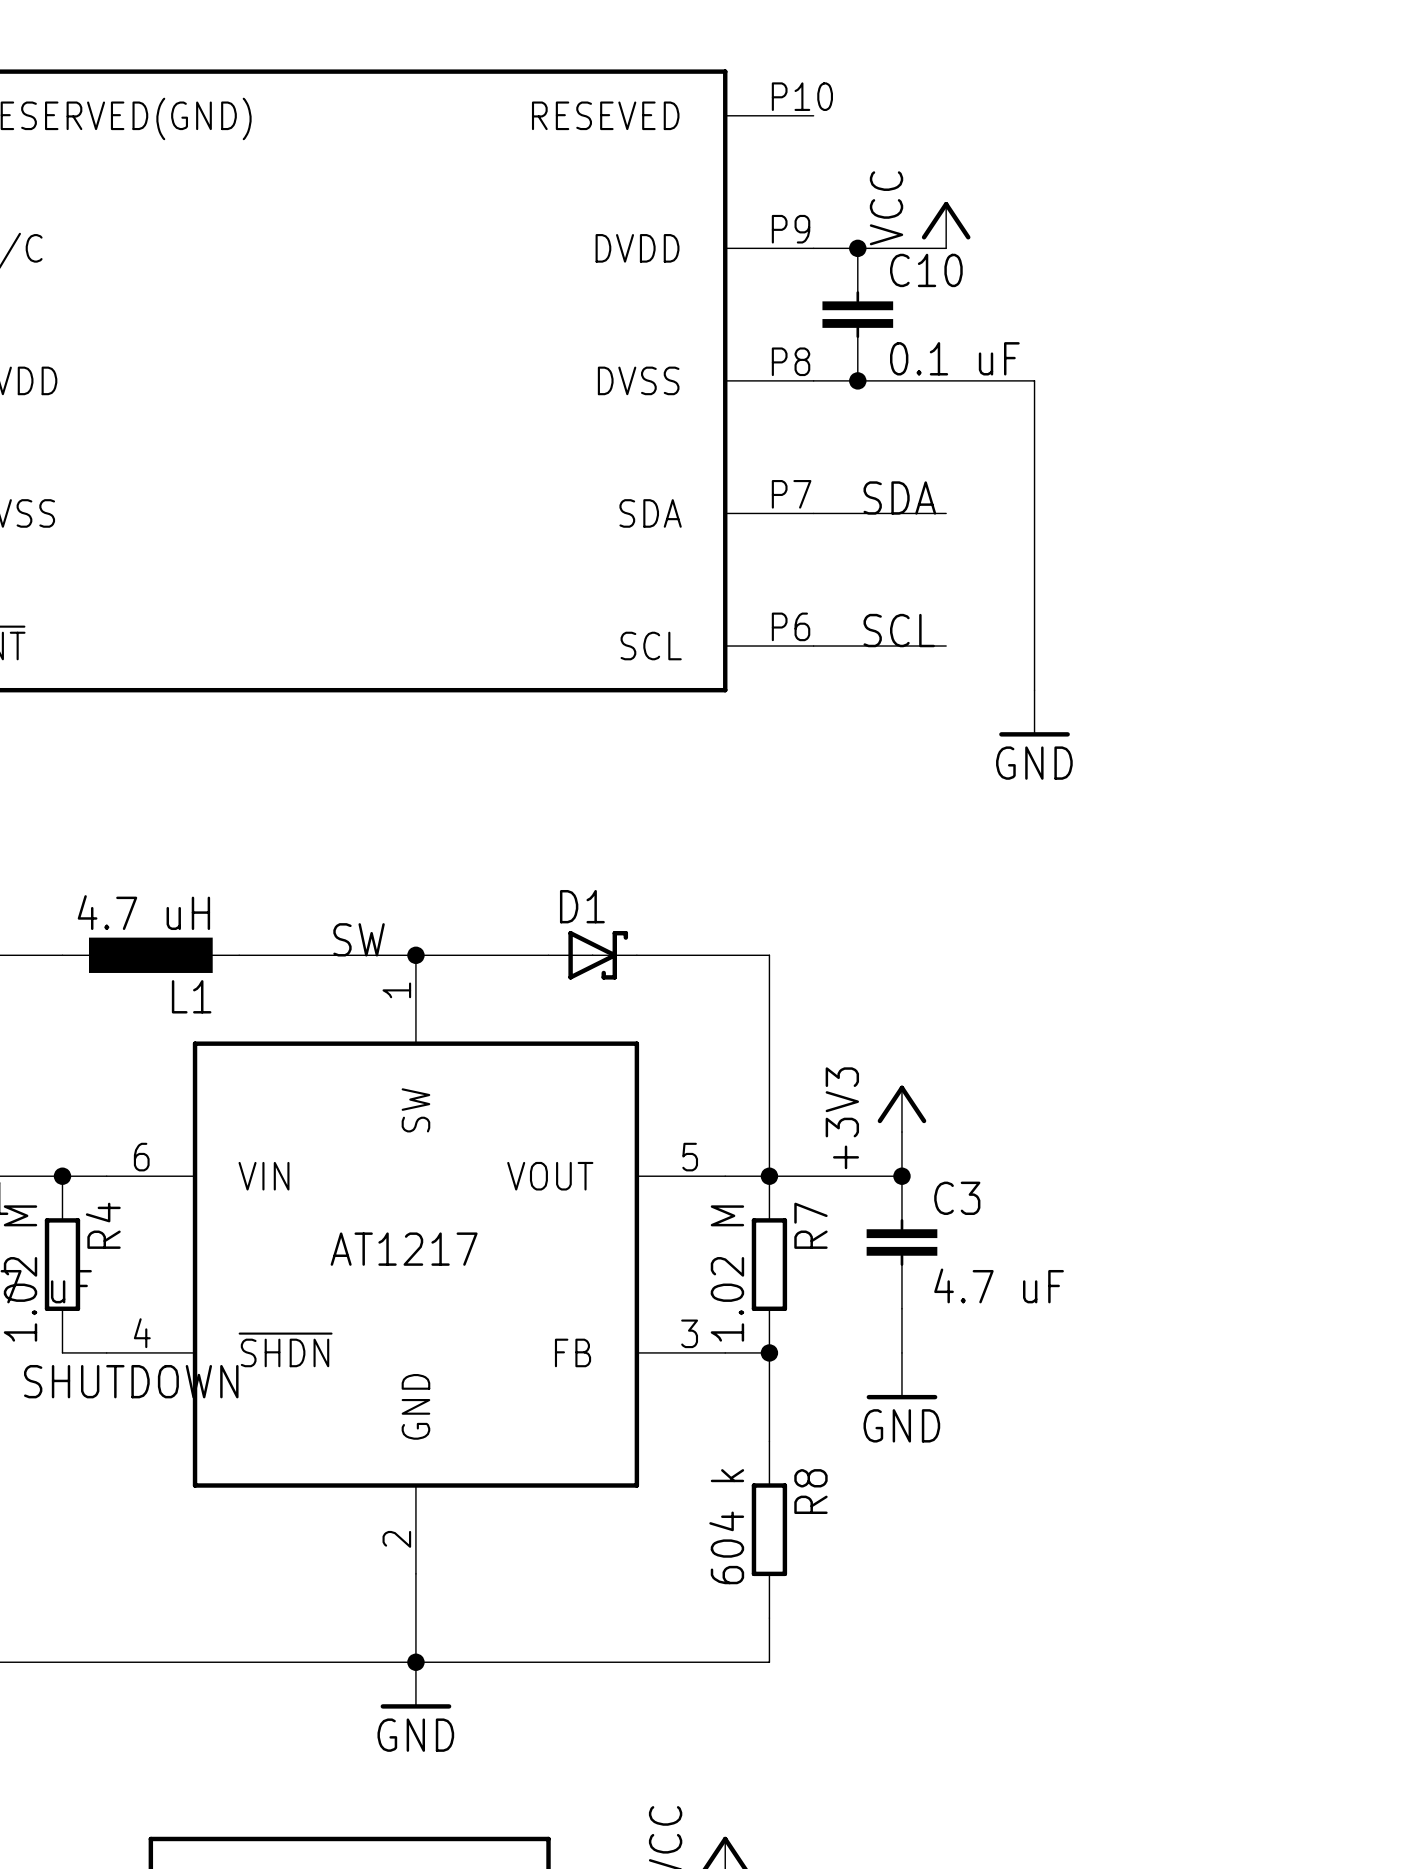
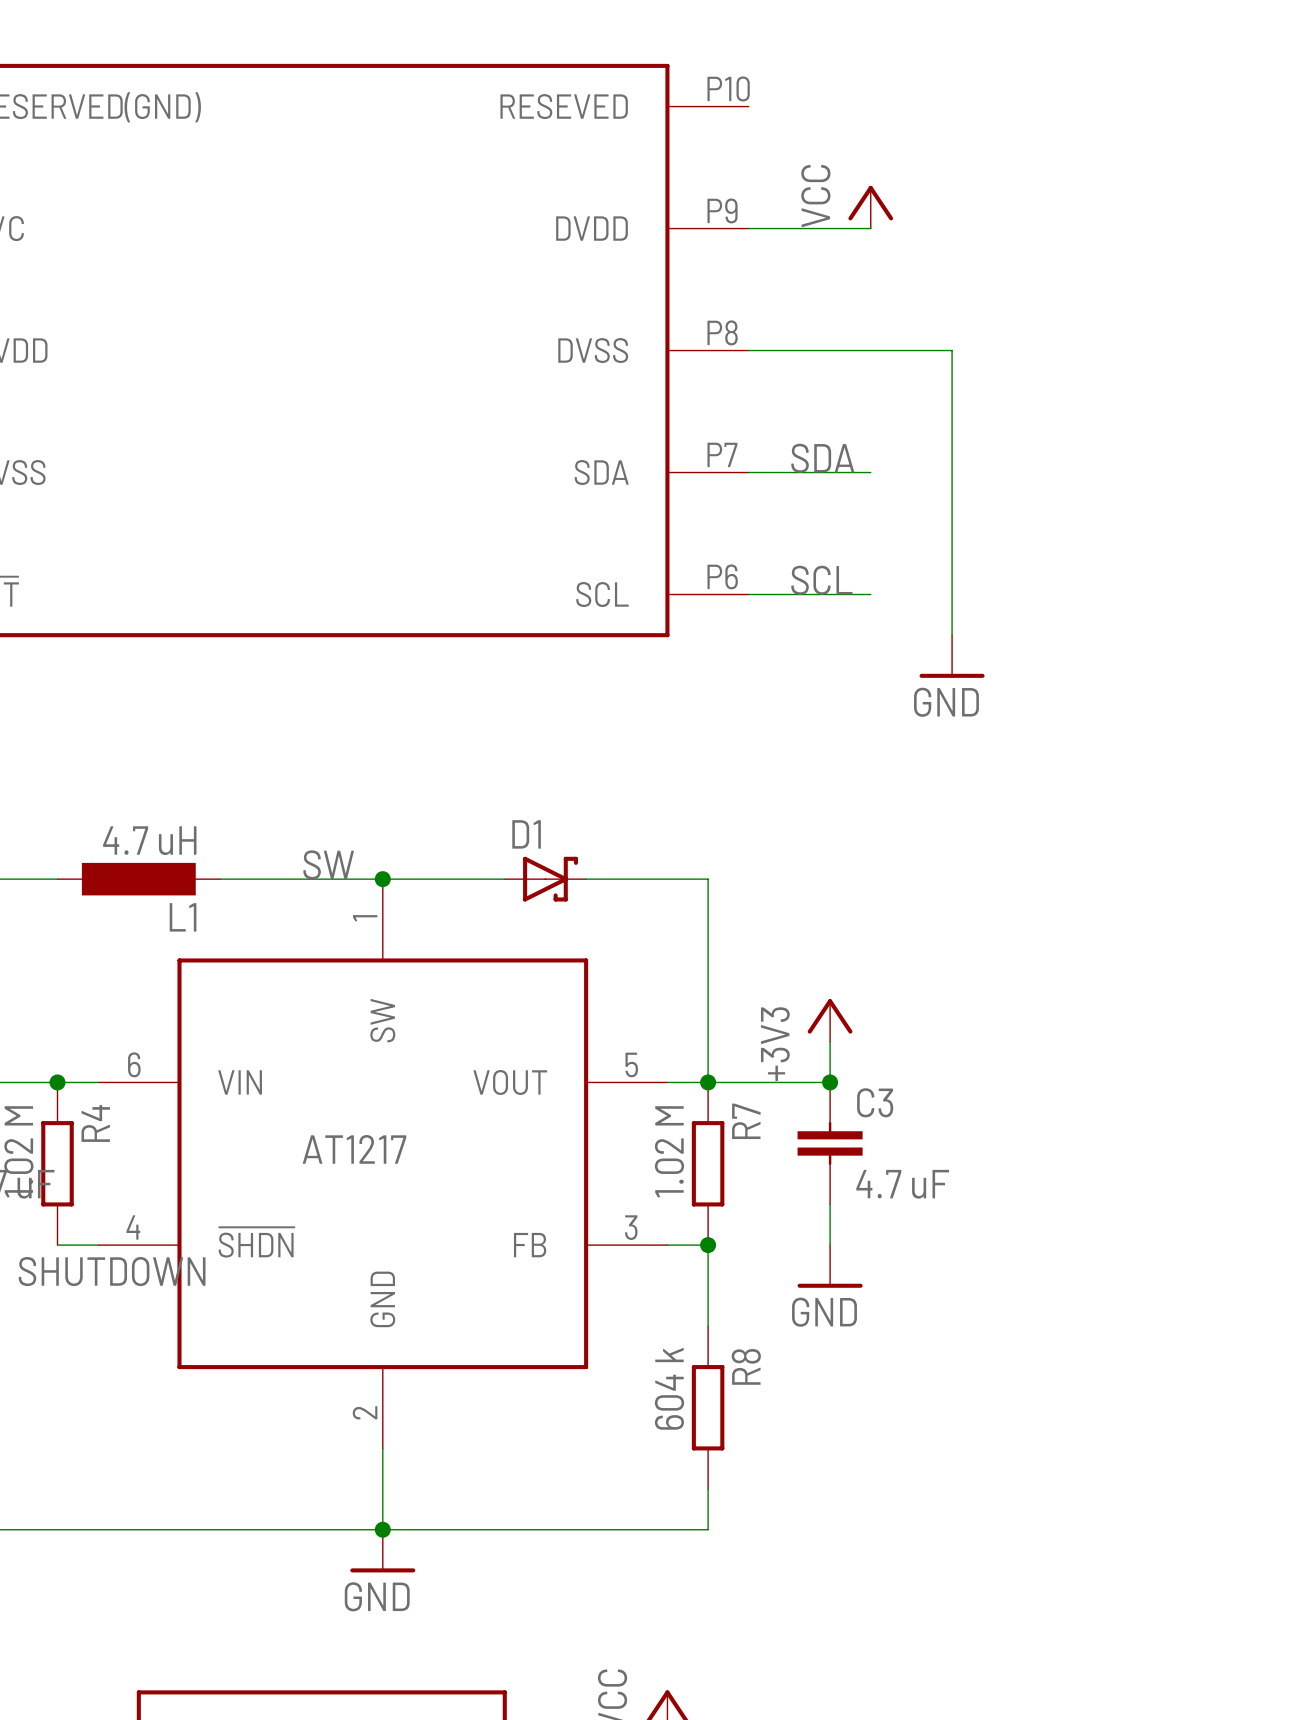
junction: (857, 248) -> none
C10: 0.1 uF (857, 314) -> none
junction: (857, 380) -> none

